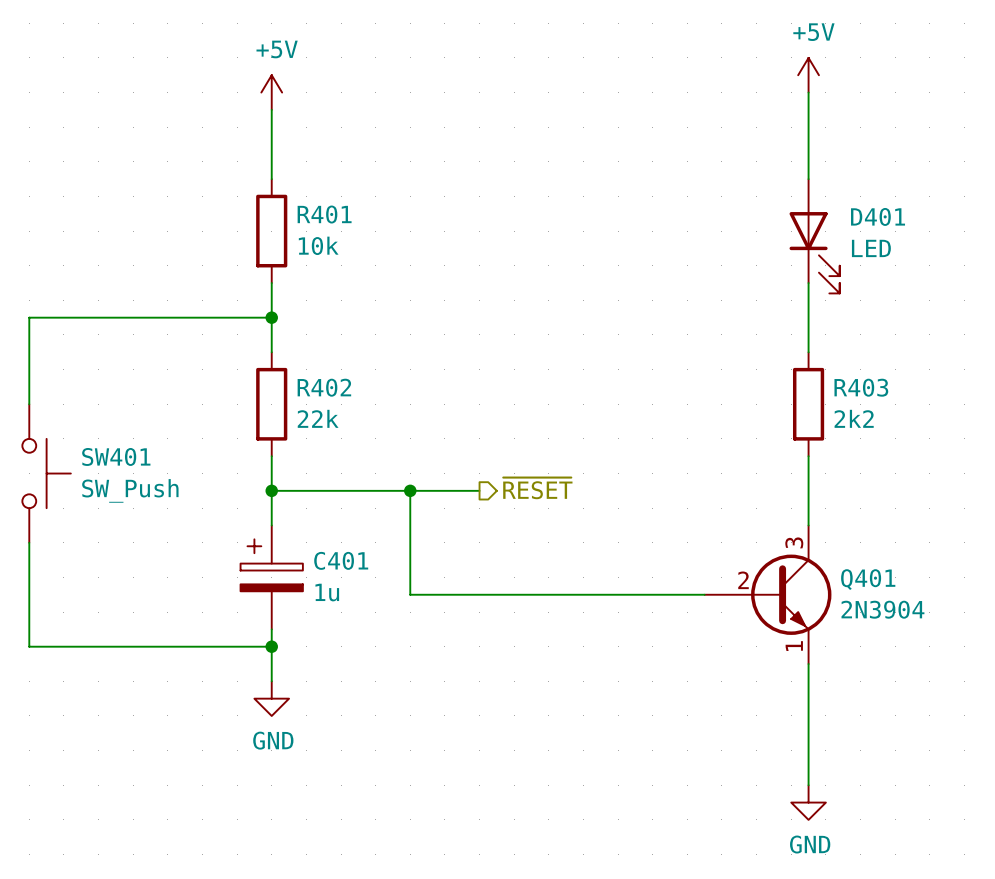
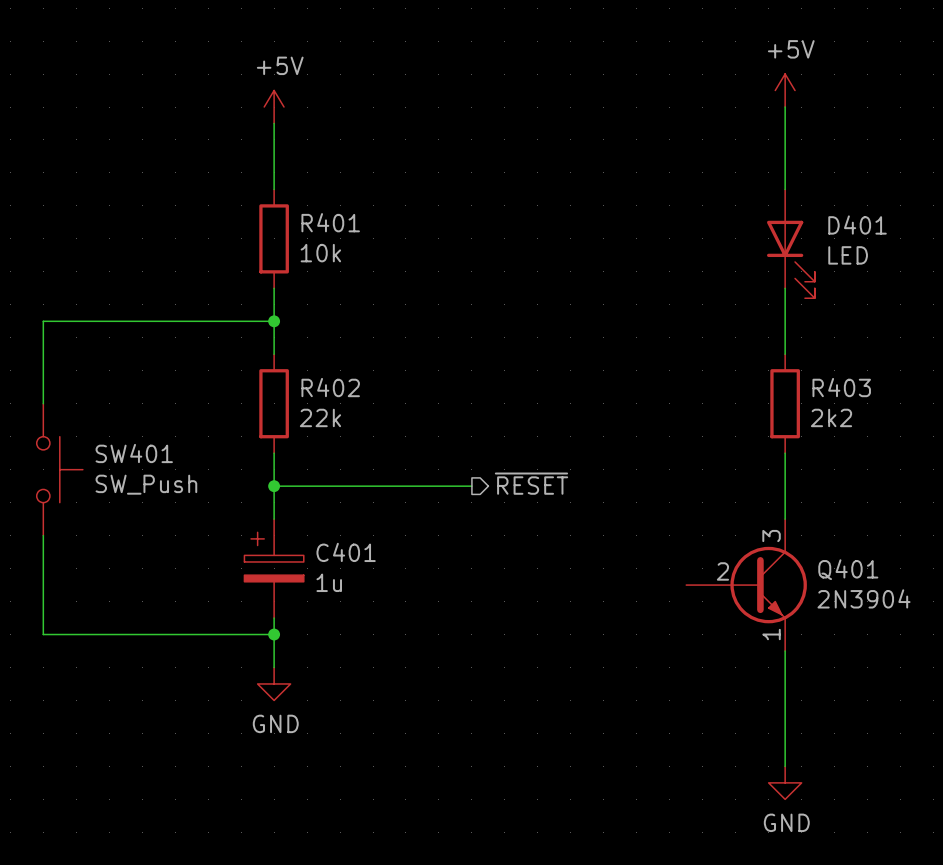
wire: (410, 490) (410, 594) (704, 594) -> none
junction: (410, 490) -> none

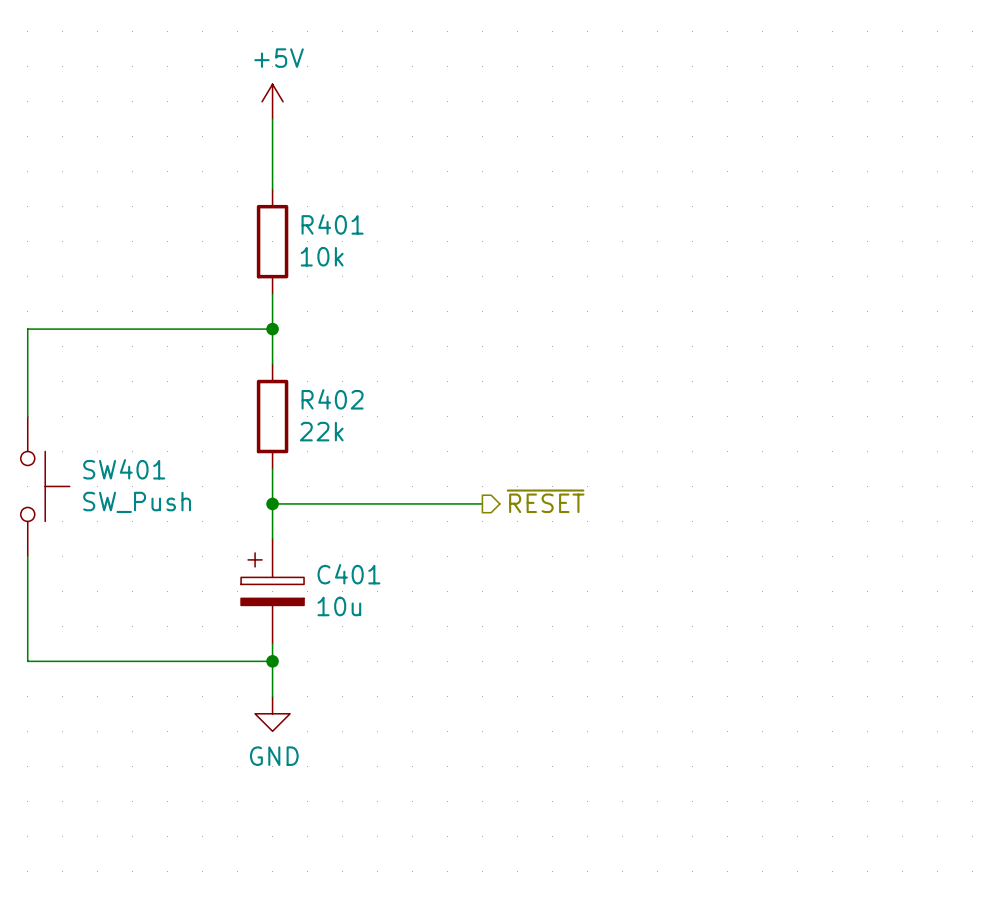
power symbol: +5V (785, 90) -> none
wire: (785, 107) (785, 189) -> none
D401: LED (790, 243) -> none
wire: (785, 288) (785, 354) -> none
R403: 2k2 (785, 403) -> none
wire: (785, 453) (785, 519) -> none
C401 value: 1u (329, 582) -> 10u (339, 606)
Q401: 2N3904 (746, 585) -> none
wire: (785, 651) (785, 766) -> none
power symbol: GND (785, 782) -> none

